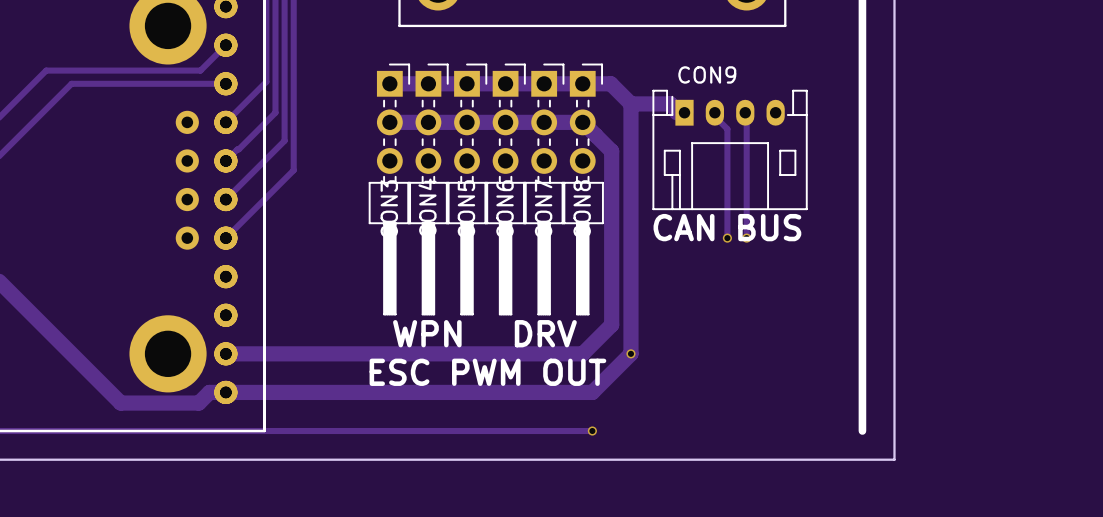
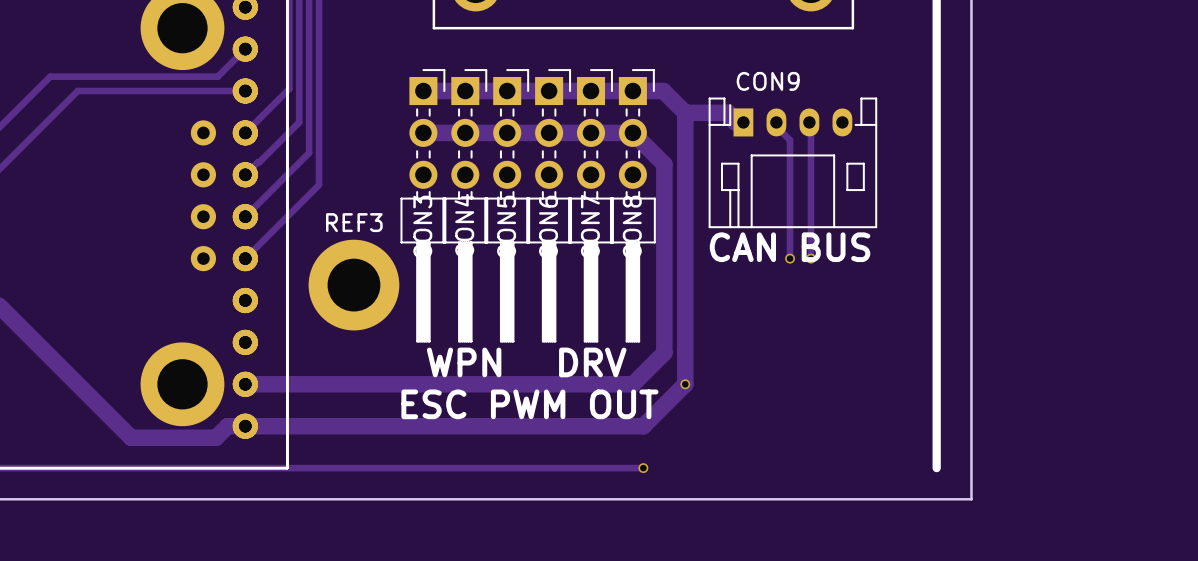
REF3: none -> (353, 285)

